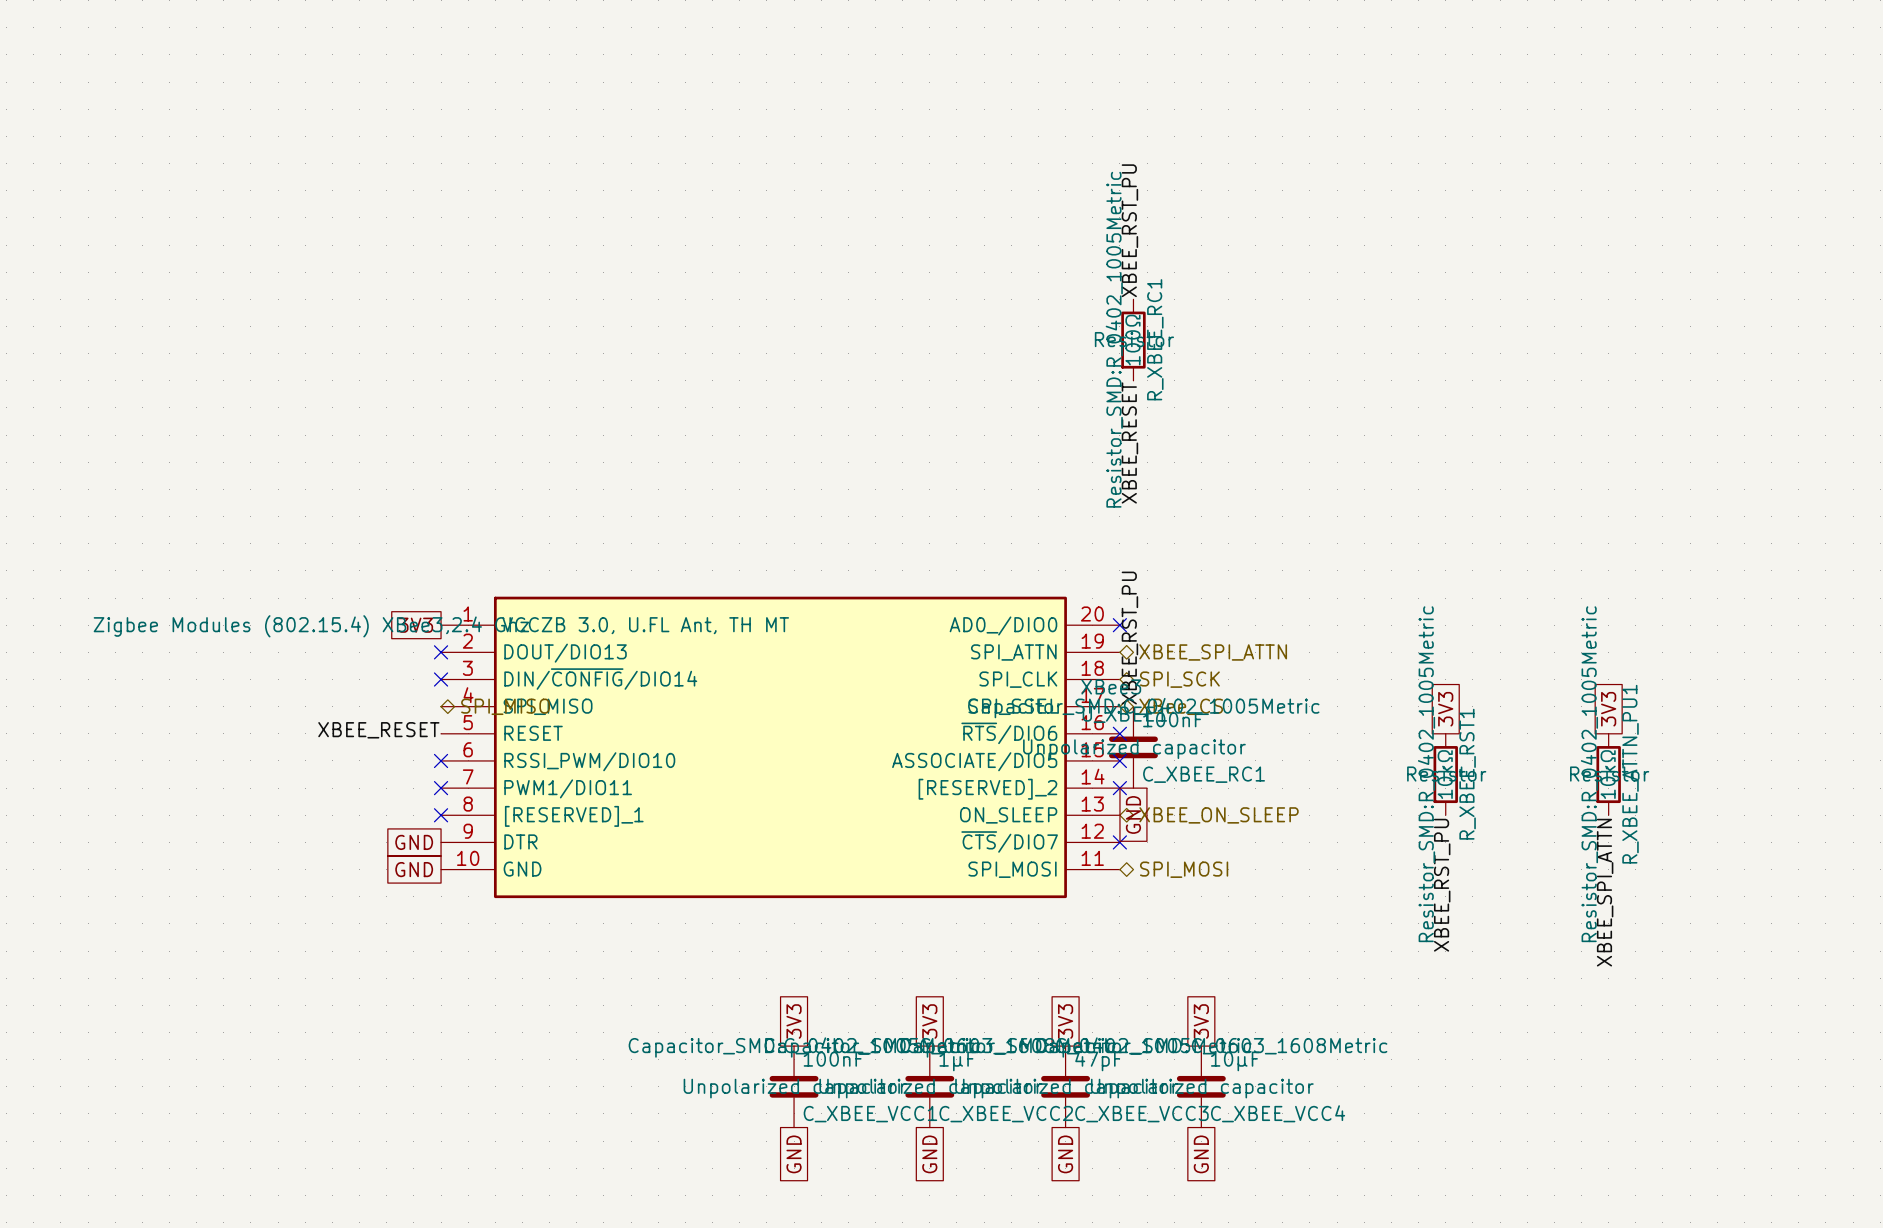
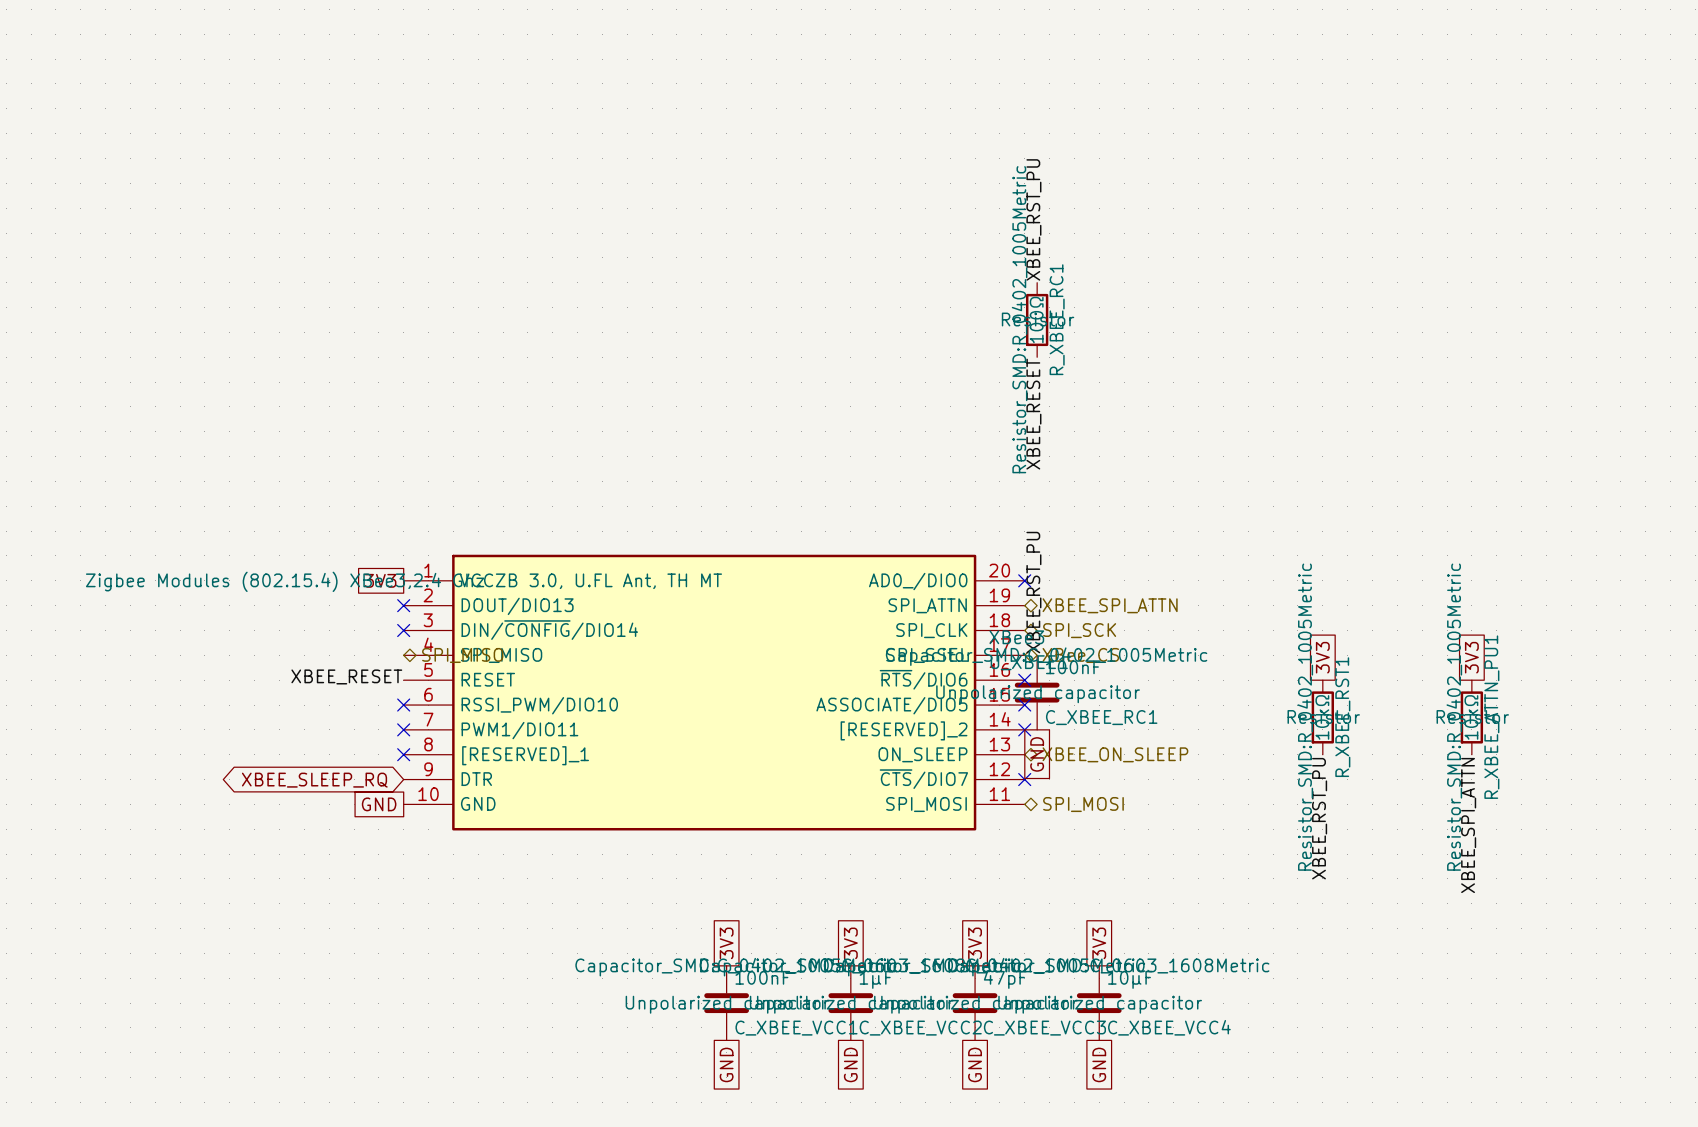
global label shape: passive (414, 842) -> bidirectional (314, 780)
global label: GND (414, 842) -> XBEE_SLEEP_RQ (314, 780)

